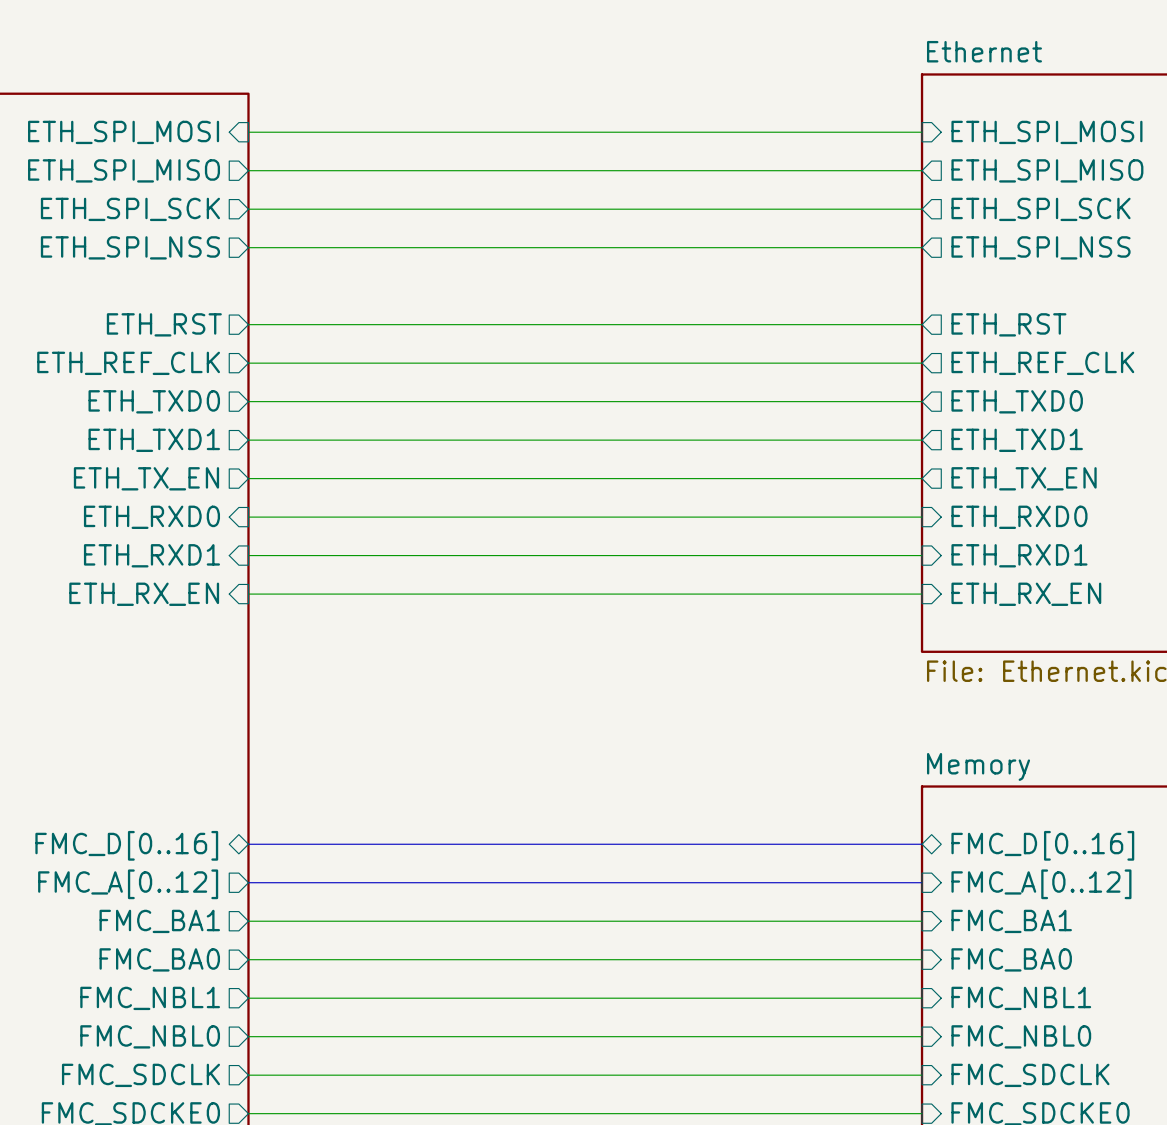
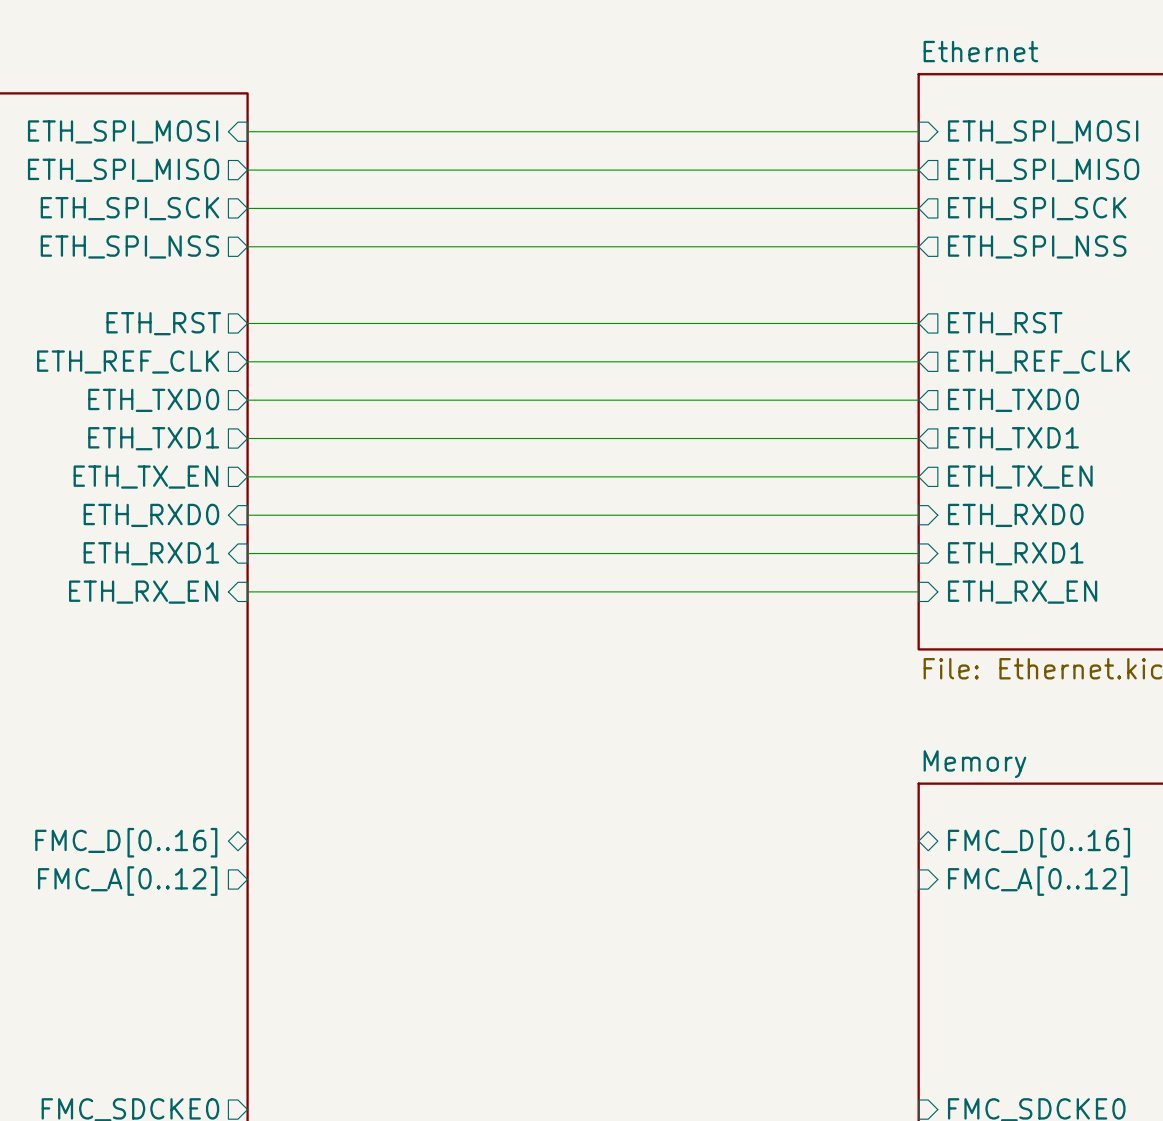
bus: (248, 844) (922, 844) -> none
bus: (248, 882) (922, 882) -> none
sheet pin: FMC_BA1 (159, 921) -> none
wire: (248, 921) (922, 921) -> none
sheet pin: FMC_BA1 (1011, 921) -> none
sheet pin: FMC_BA0 (159, 959) -> none
wire: (248, 959) (922, 959) -> none
sheet pin: FMC_BA0 (1011, 959) -> none
sheet pin: FMC_NBL1 (150, 998) -> none
wire: (248, 998) (922, 998) -> none
sheet pin: FMC_NBL1 (1021, 998) -> none
sheet pin: FMC_NBL0 (150, 1036) -> none
wire: (248, 1036) (922, 1036) -> none
sheet pin: FMC_NBL0 (1021, 1036) -> none
sheet pin: FMC_SDCLK (140, 1075) -> none
wire: (248, 1075) (922, 1075) -> none
sheet pin: FMC_SDCLK (1030, 1075) -> none
wire: (248, 1113) (922, 1113) -> none

